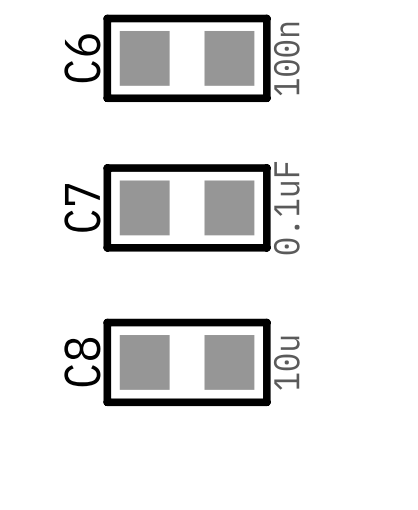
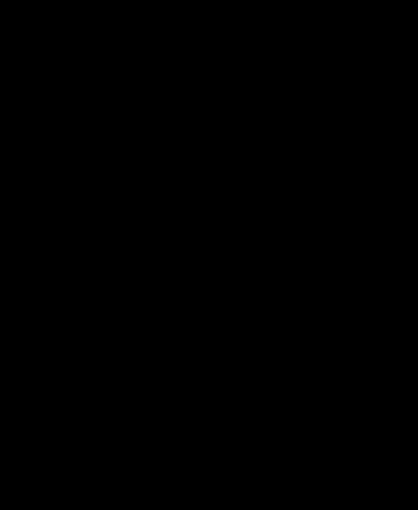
C6: 100n (187, 58) -> none
C7: 0.1uF (187, 207) -> none
C8: 10u (187, 362) -> none

